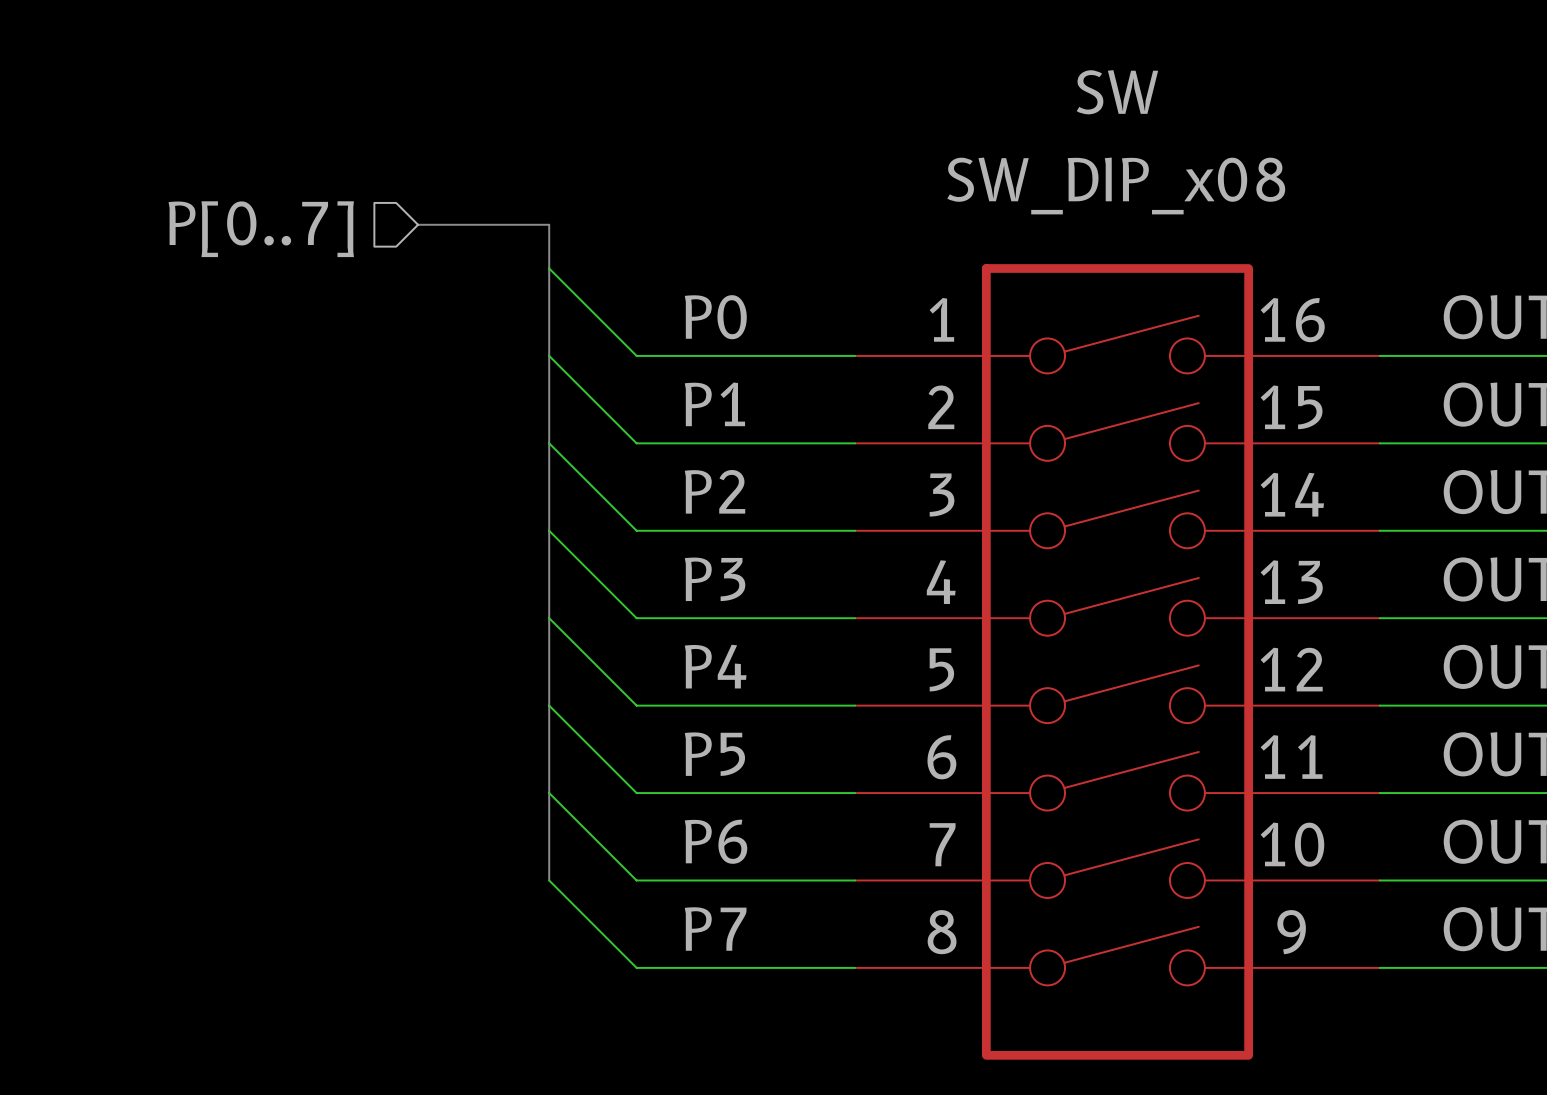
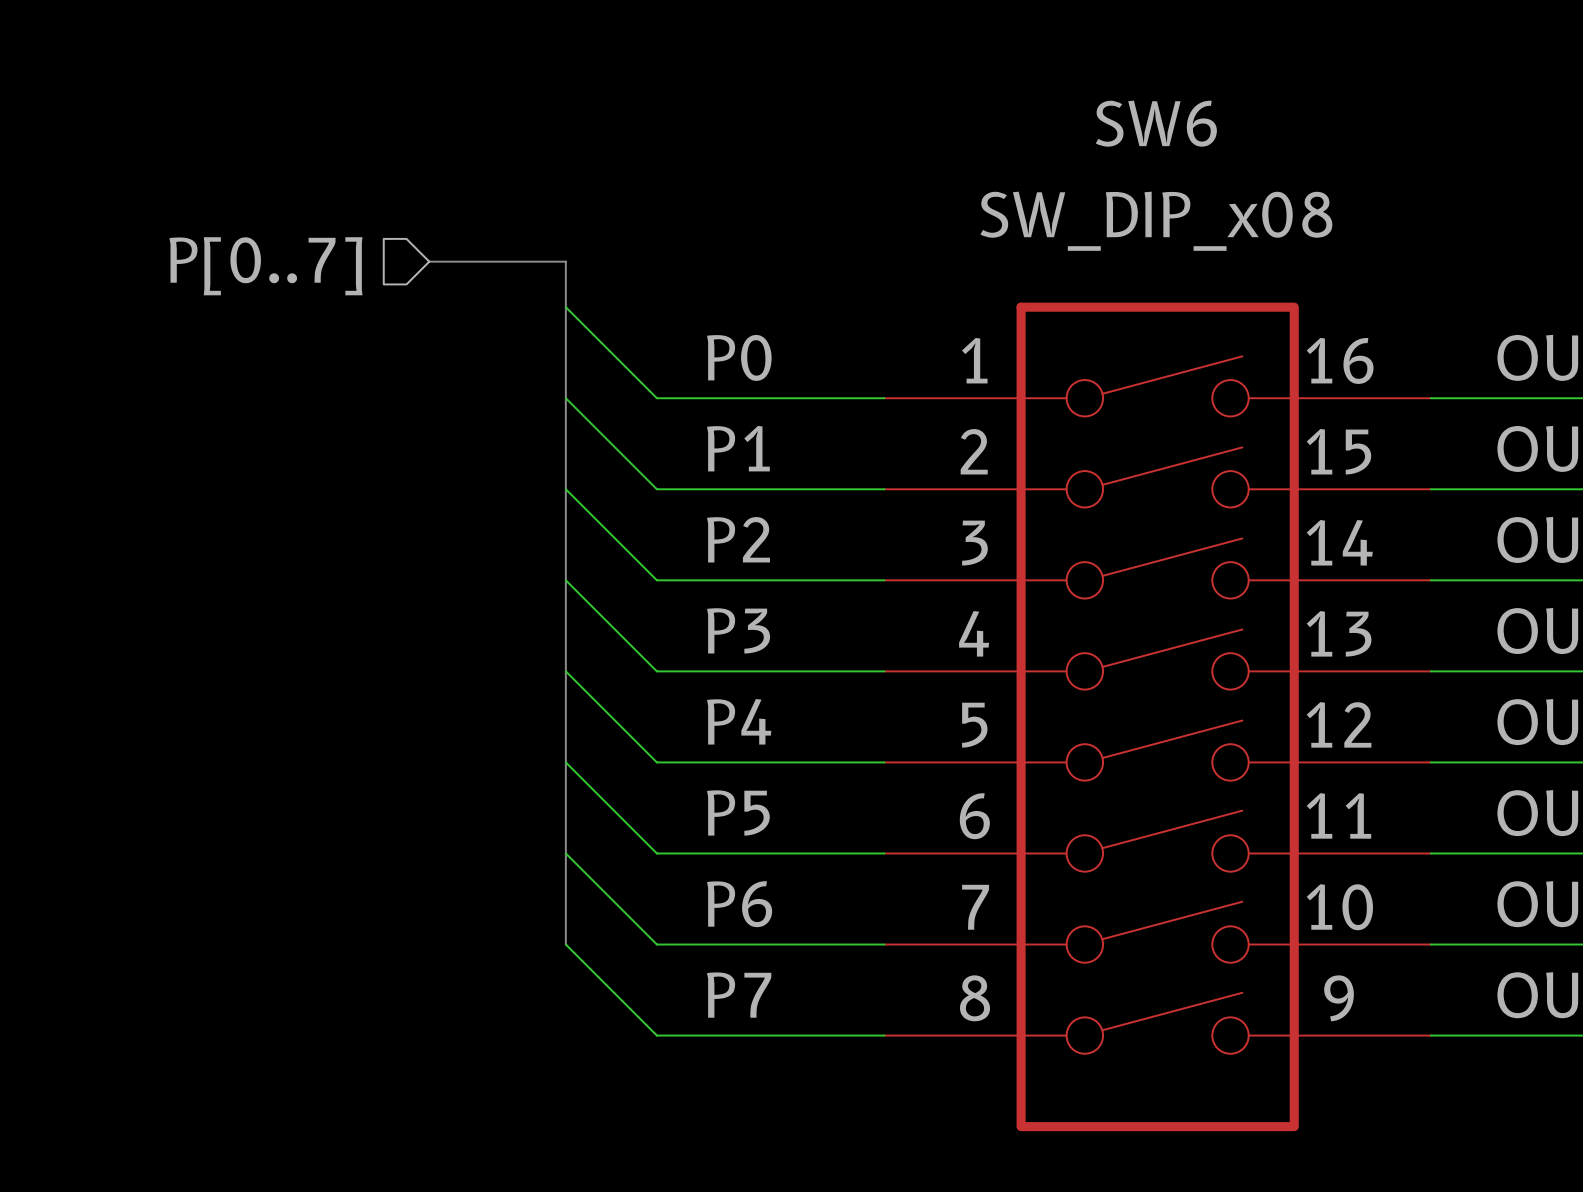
SW name: SW (1117, 92) -> SW6 (1156, 123)

